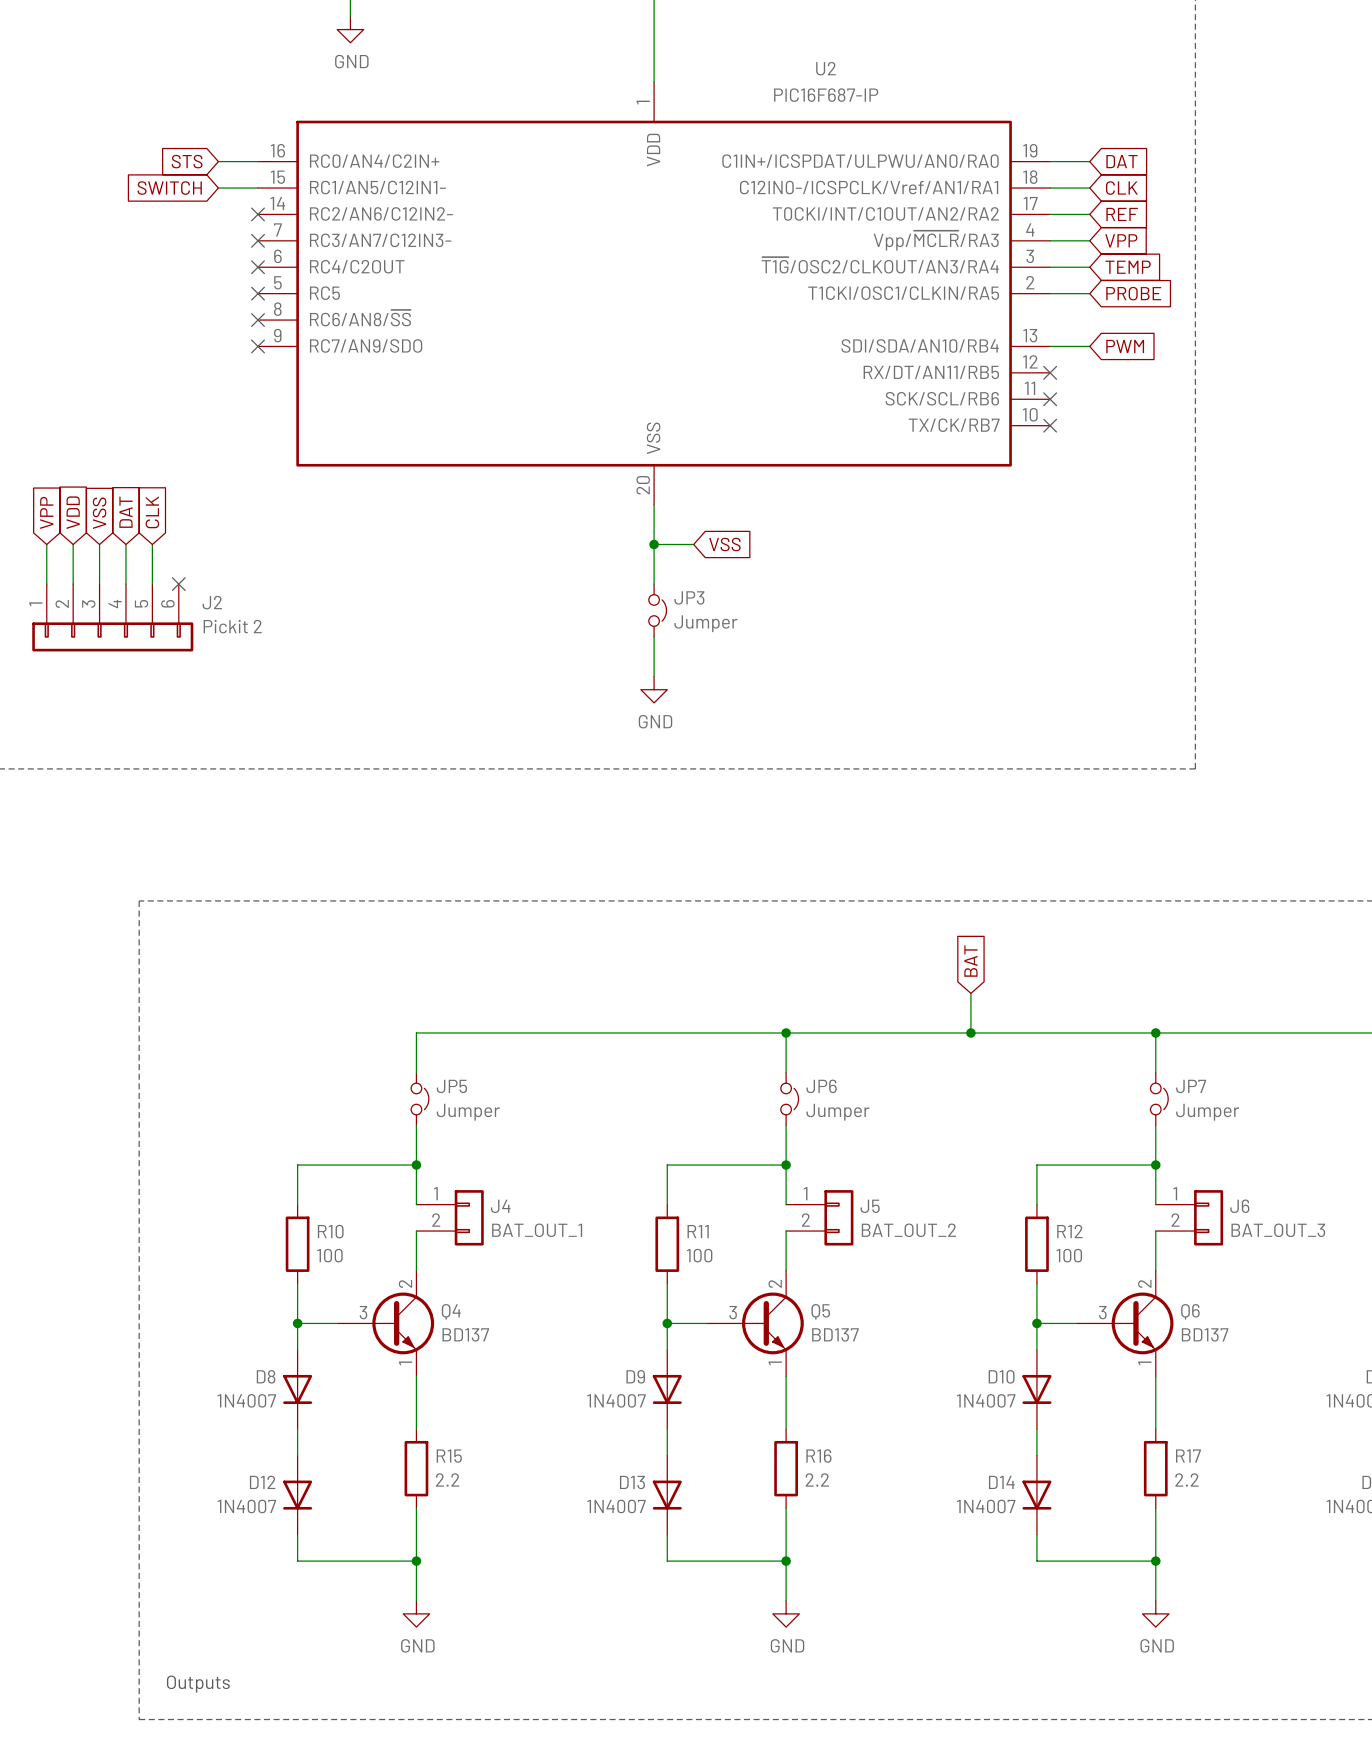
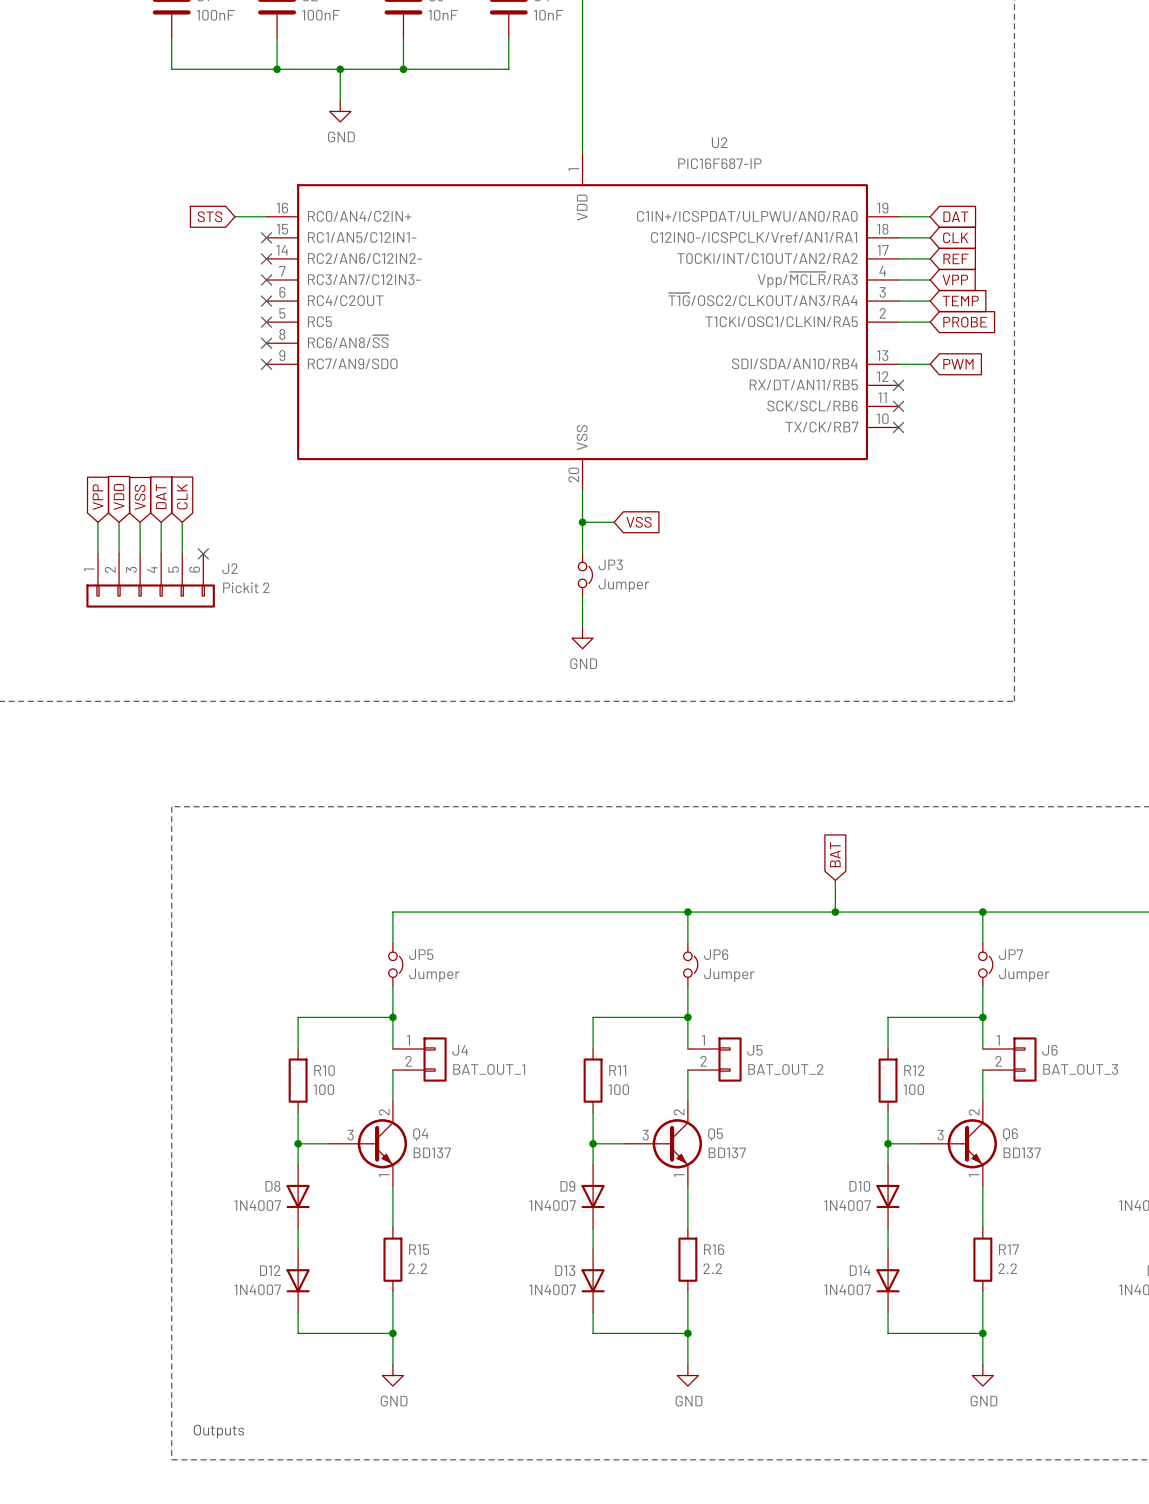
global label: SWITCH (169, 188) -> none
wire: (218, 188) (258, 188) -> none
no-connect mark: none -> (266, 237)

